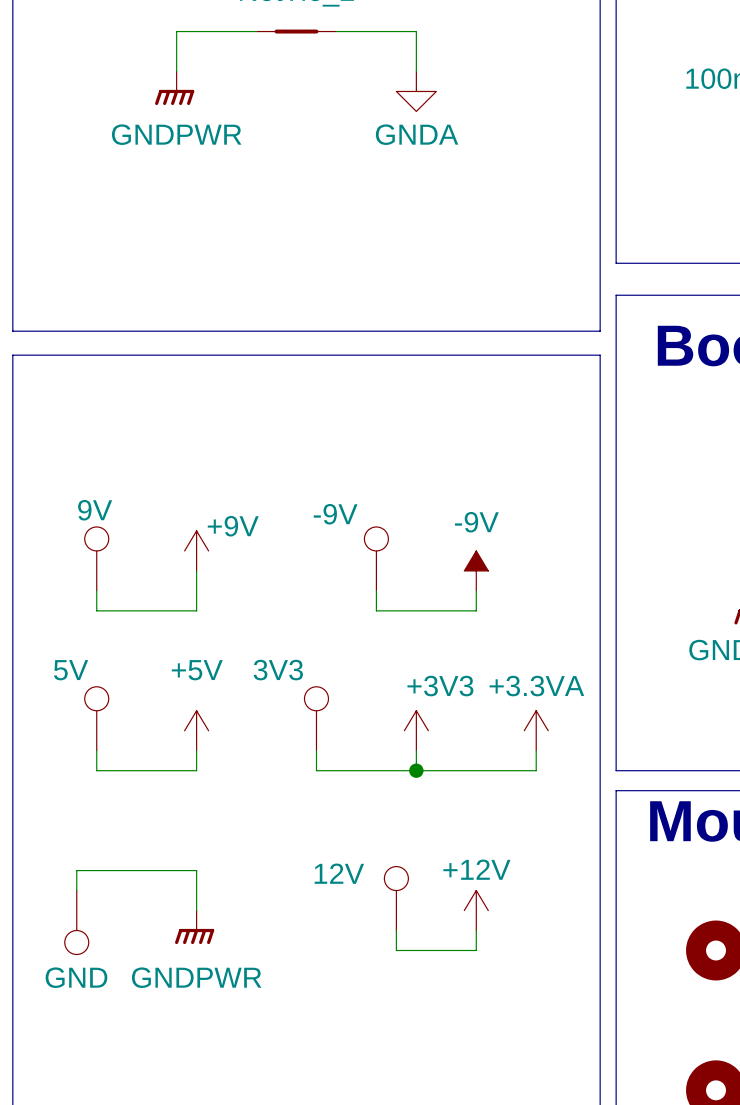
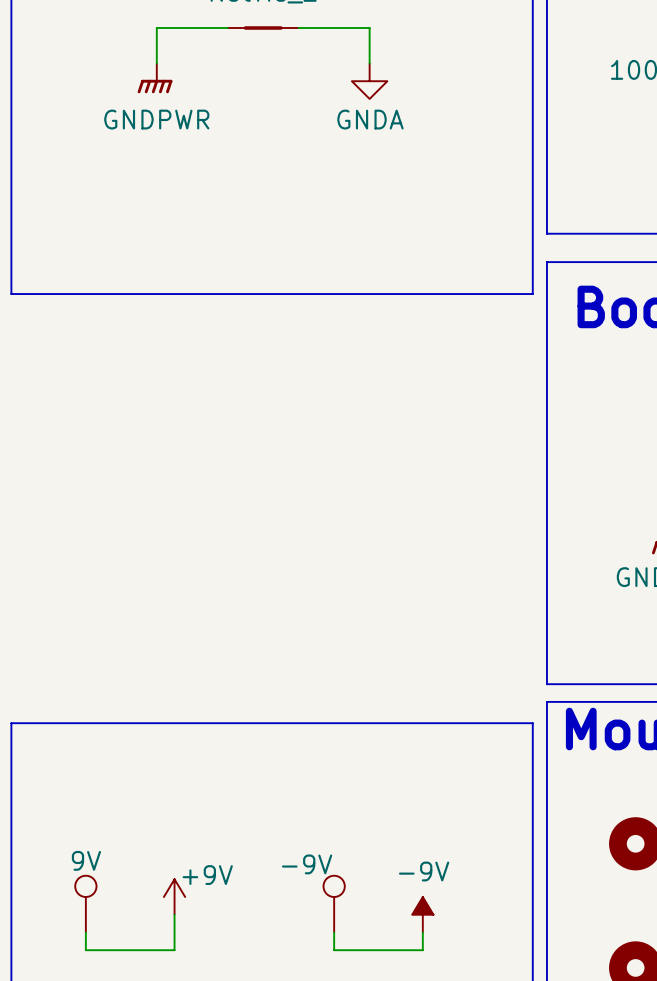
power symbol: +9V (196, 550) -> none
part: 9V (96, 558) -> none
part: -9V (376, 558) -> none
wire: (196, 570) (196, 610) (96, 610) (96, 590) -> none
power symbol: -9V (476, 570) -> none
wire: (376, 590) (376, 610) (476, 610) (476, 590) -> none
part: 5V (96, 718) -> none
part: 3V3 (316, 718) -> none
power symbol: +5V (196, 730) -> none
power symbol: +3V3 (416, 730) -> none
power symbol: +3.3VA (536, 730) -> none
wire: (96, 750) (96, 770) (196, 770) (196, 750) -> none
wire: (316, 750) (316, 770) (536, 770) (536, 750) -> none
wire: (416, 750) (416, 770) -> none
junction: (416, 770) -> none
line: (12, 814) (12, 355) (600, 355) (600, 814) -> (11, 723) (532, 723)
wire: (76, 890) (76, 870) (196, 870) (196, 910) -> none
part: 12V (396, 898) -> none
power symbol: +12V (476, 910) -> none
part: GND (76, 922) -> none
power symbol: GNDPWR (194, 927) -> none
wire: (396, 930) (396, 950) (476, 950) (476, 930) -> none
power symbol: none -> +9V (174, 897)
part: none -> 9V (85, 904)
part: none -> -9V (334, 904)
wire: none -> (174, 914) (174, 950) (85, 950) (85, 932)
power symbol: none -> -9V (422, 914)
wire: none -> (334, 932) (334, 950) (422, 950) (422, 932)

